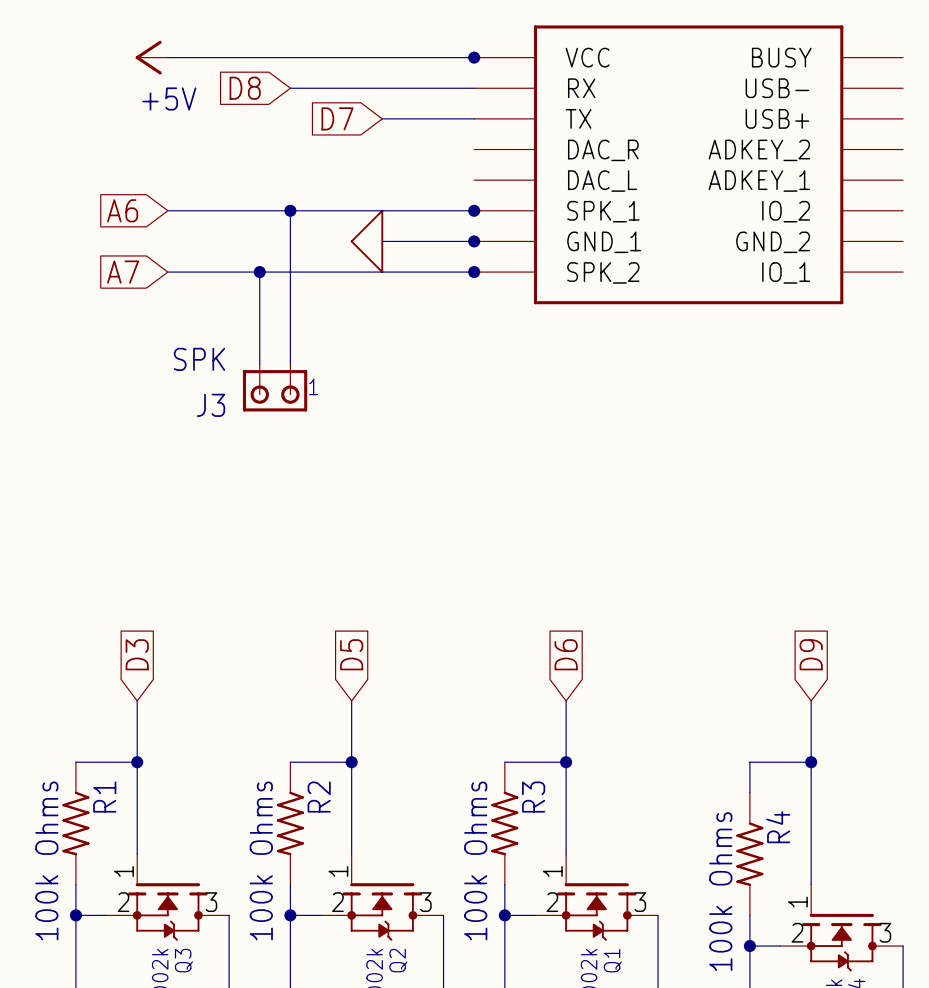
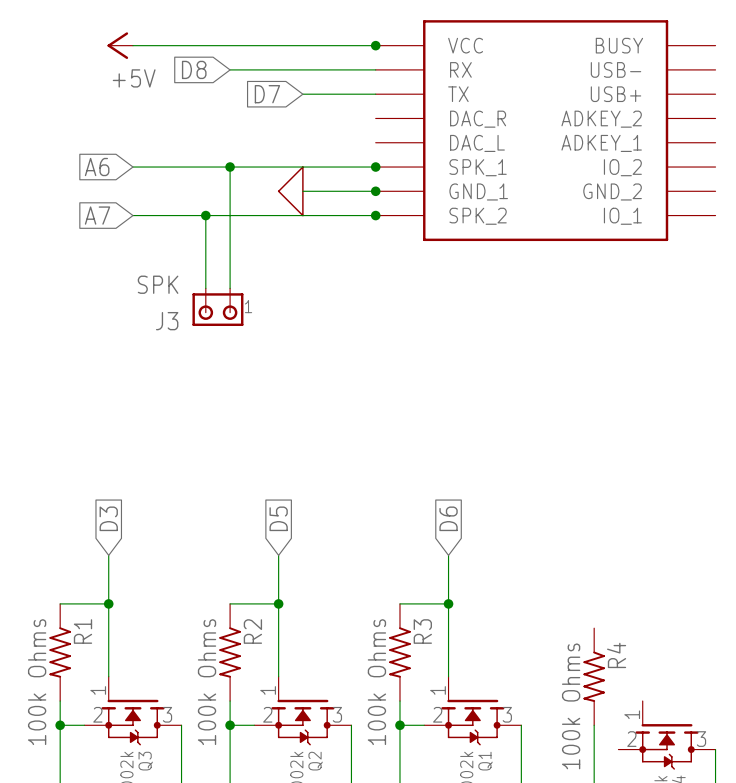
global label: D9 (811, 654) -> none
wire: (811, 700) (811, 884) -> none
wire: (811, 762) (749, 762) (749, 792) -> none
junction: (811, 762) -> none
wire: (749, 946) (780, 946) -> none
junction: (749, 946) -> none

